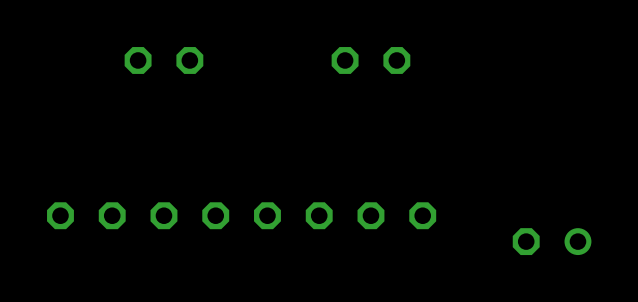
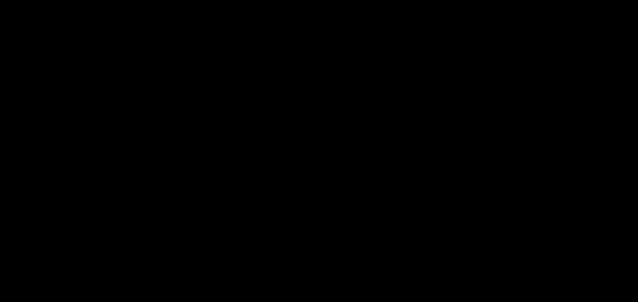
part: (163, 60) -> none
part: (370, 60) -> none
part: (86, 215) -> none
part: (189, 215) -> none
part: (293, 215) -> none
part: (396, 215) -> none
part: (552, 241) -> none

